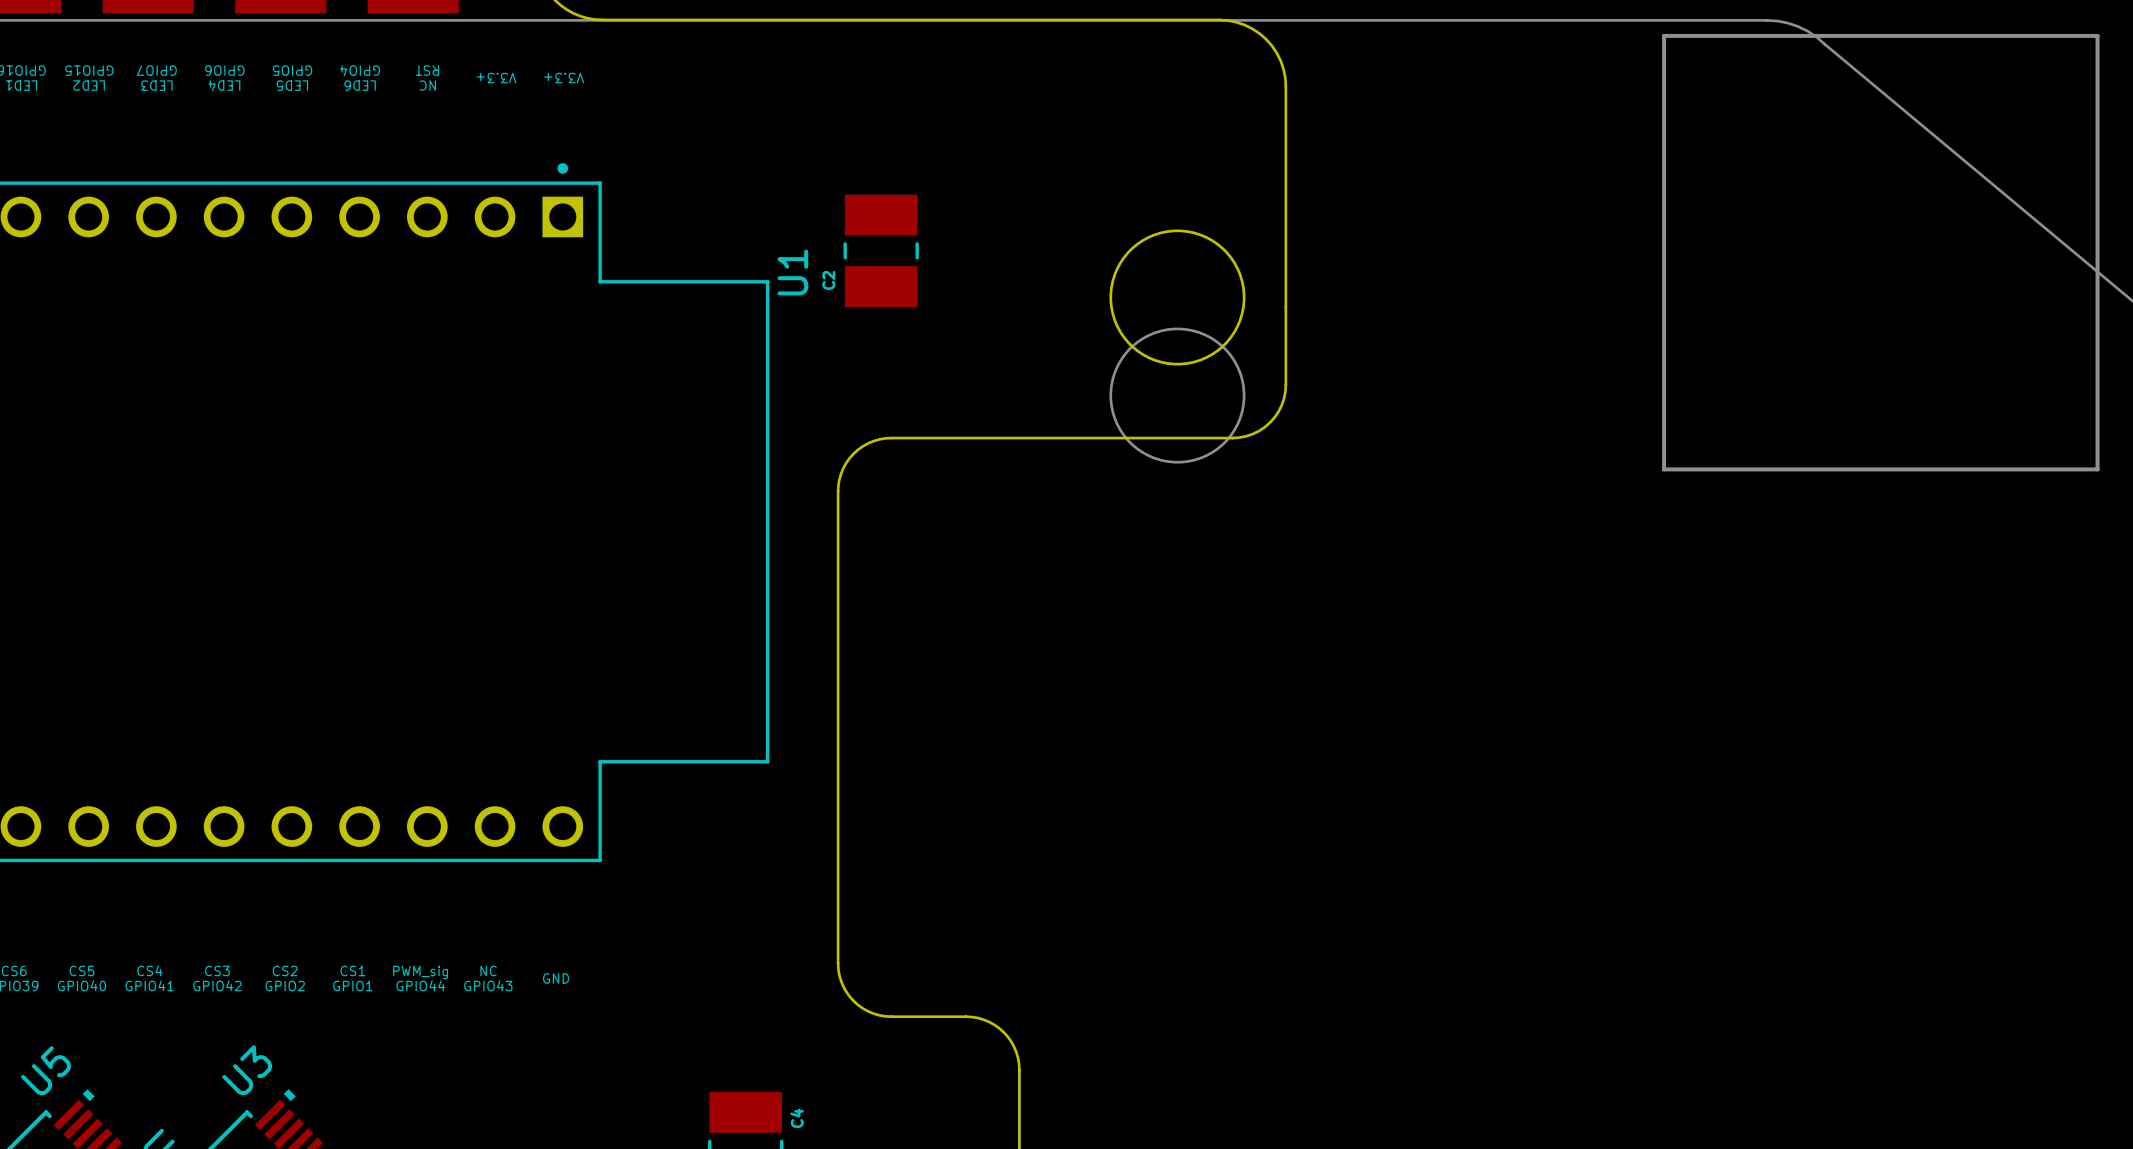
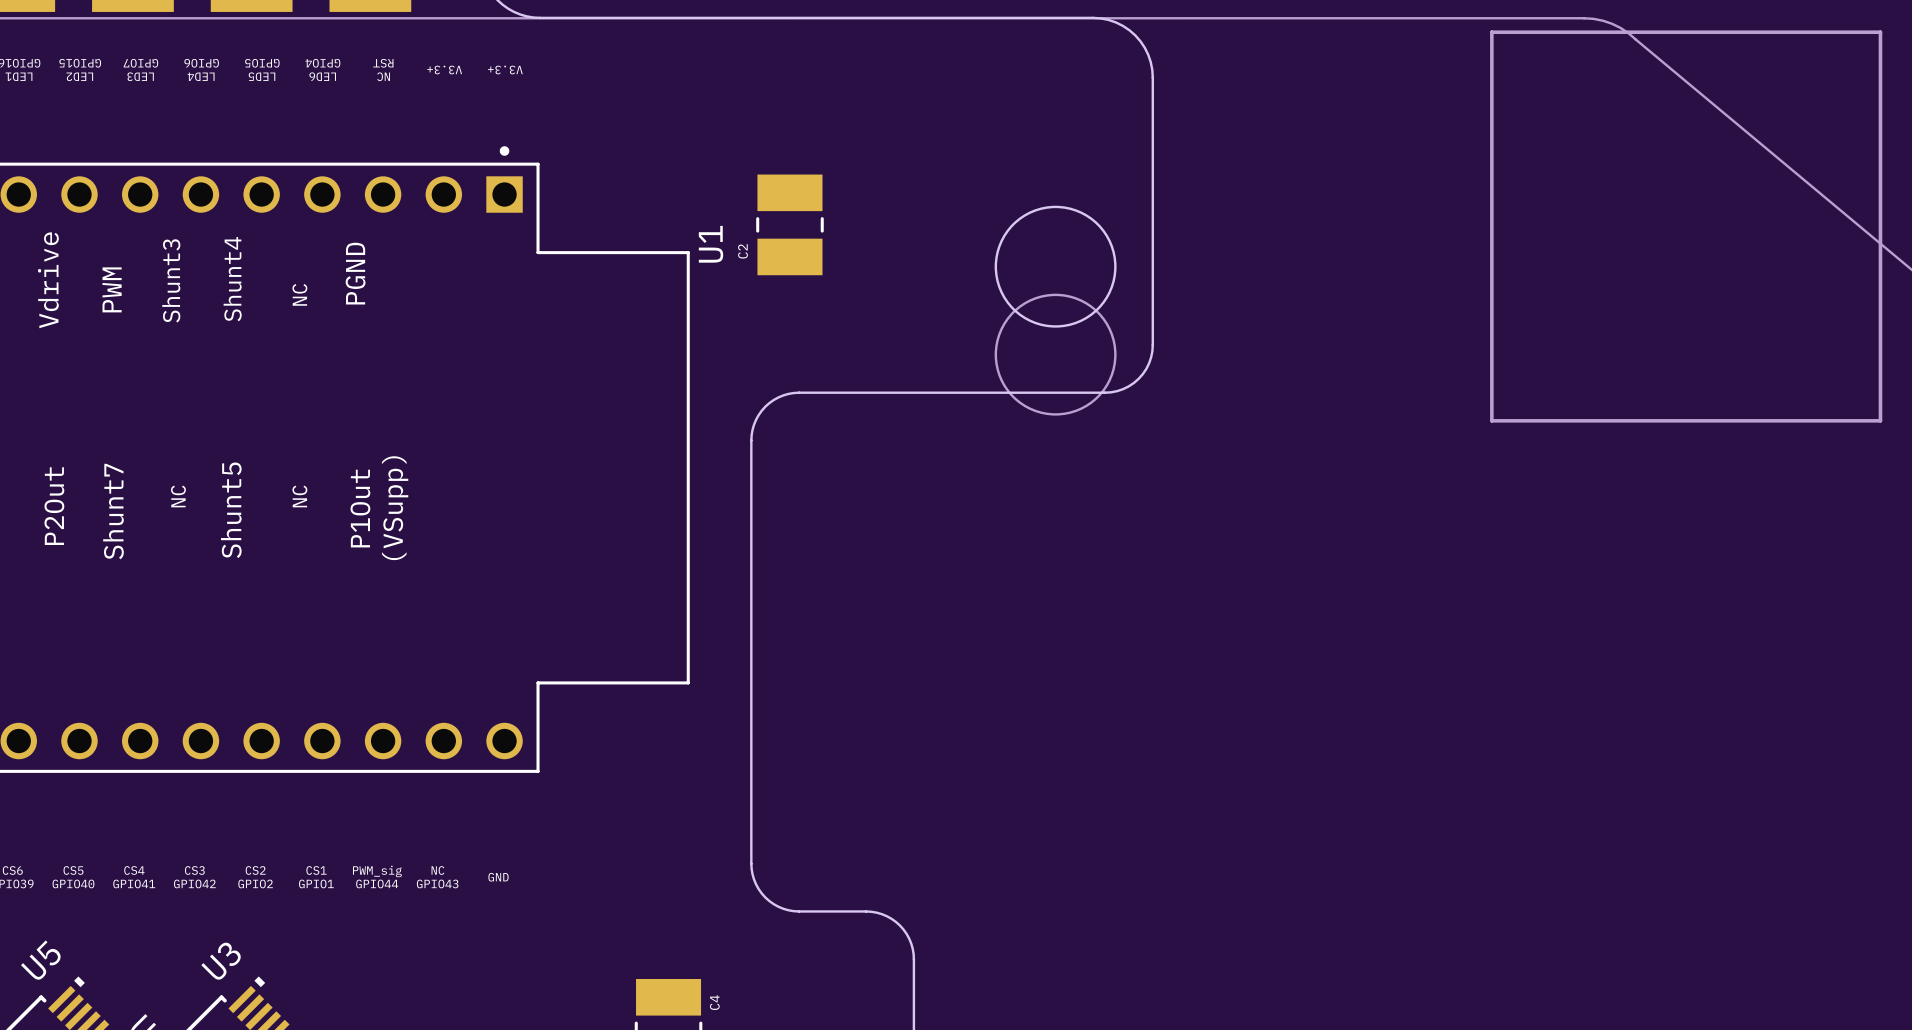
text: none -> PGND (355, 273)
text: none -> Shunt4 (232, 279)
text: none -> Shunt3 (171, 280)
text: none -> Vdrive (48, 280)
text: none -> PWM (112, 289)
text: none -> NC (299, 294)
text: none -> NC (178, 496)
text: none -> NC (299, 496)
text: none -> P2Out (54, 506)
text: none -> P1Out (360, 508)
text: none -> (VSupp) (395, 508)
text: none -> Shunt5 (231, 510)
text: none -> Shunt7 (113, 511)

